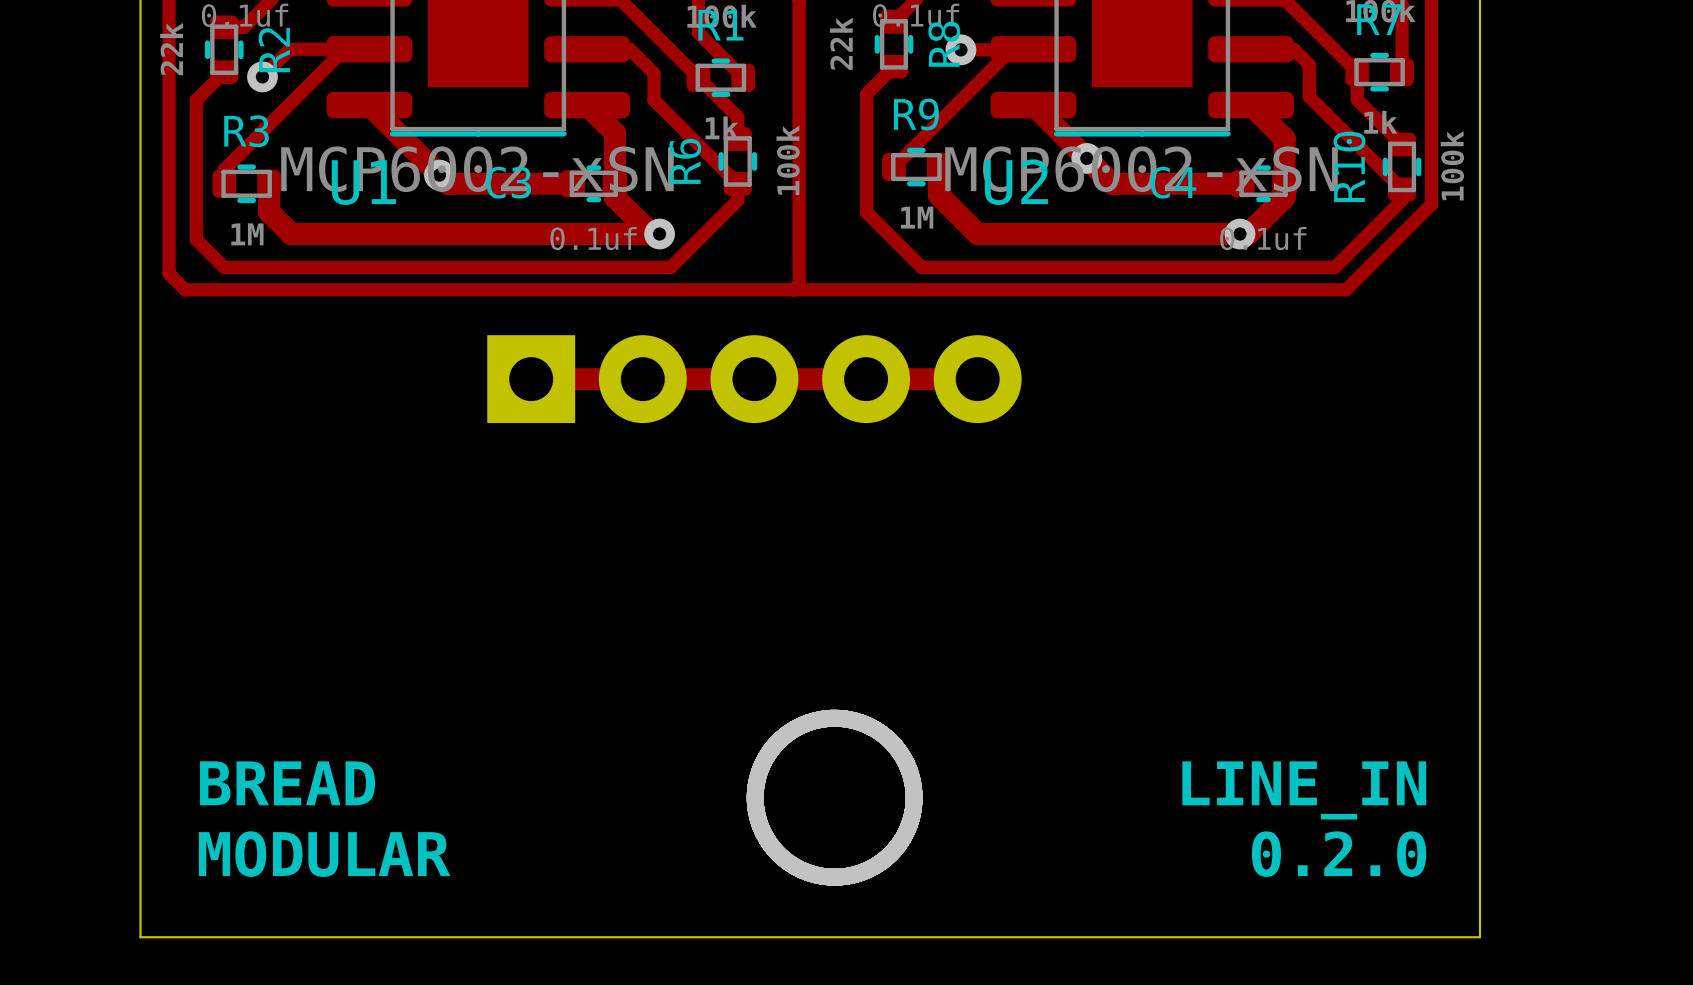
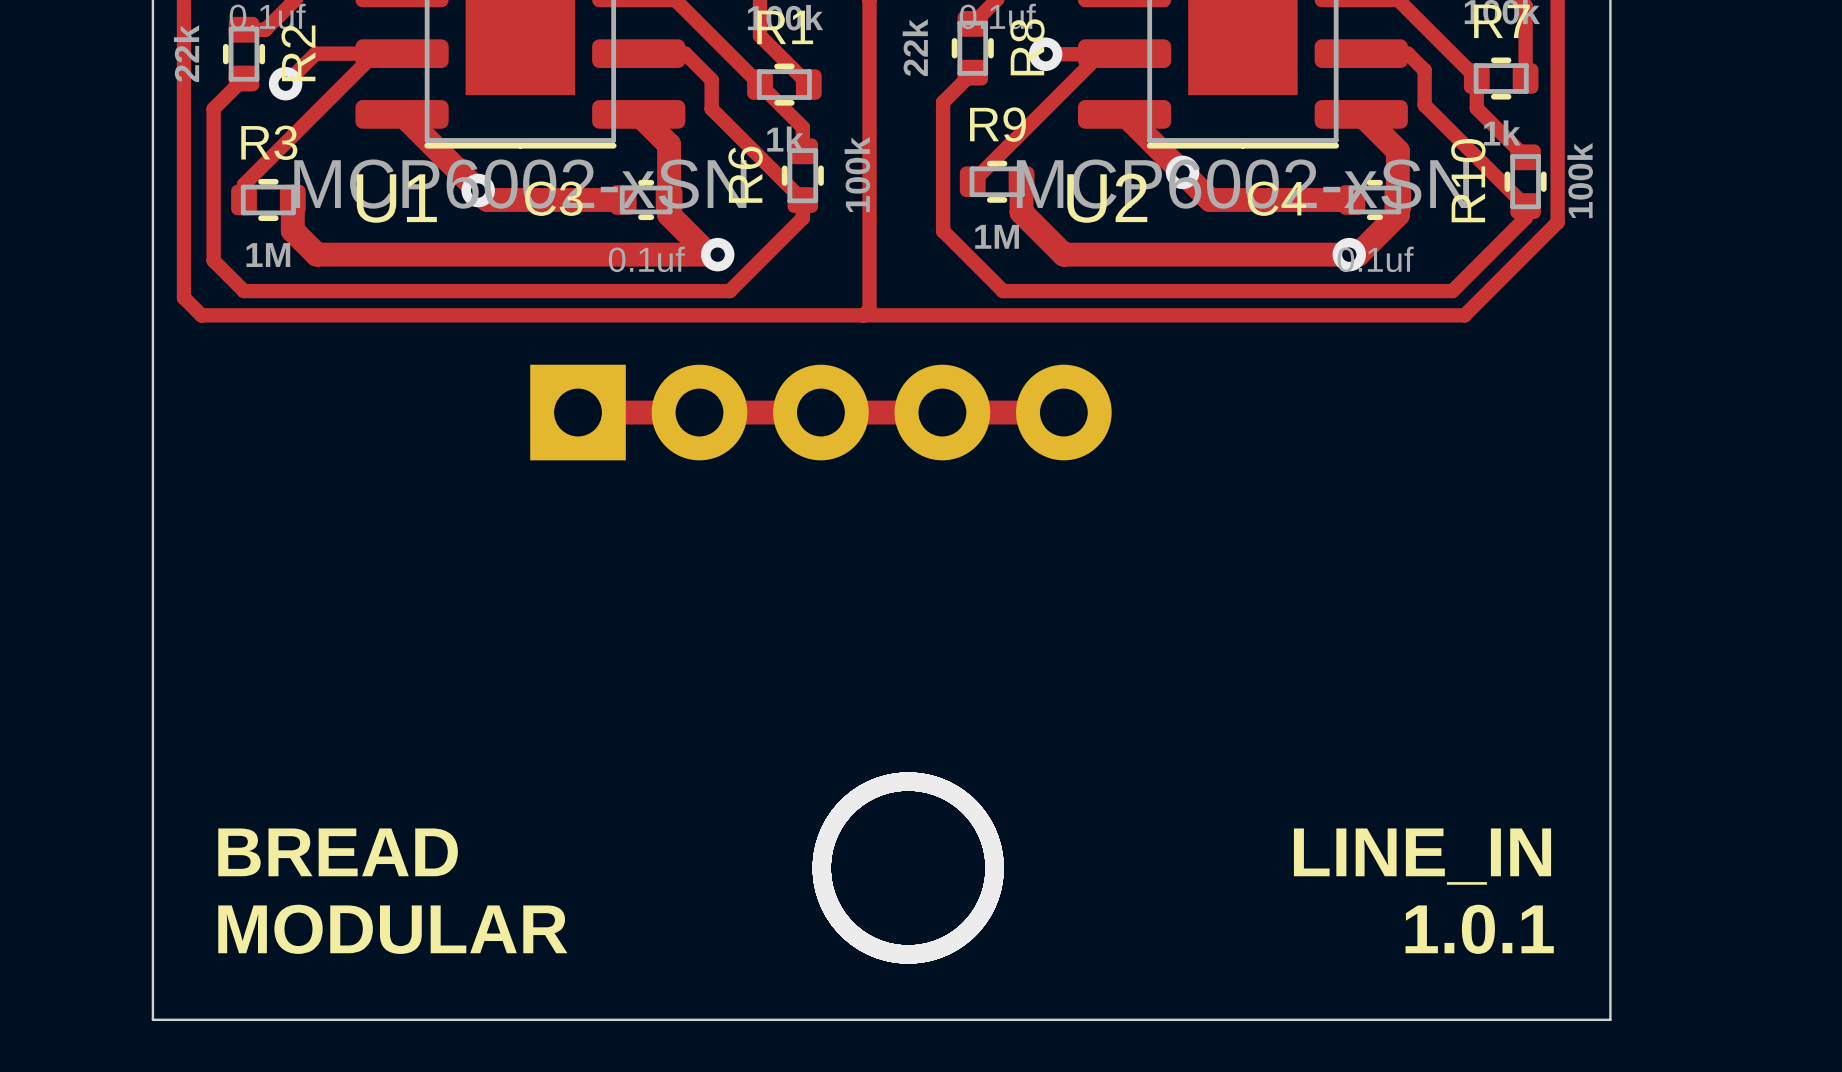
text: 0.2.0 (1339, 854) -> 1.0.1 (1479, 929)

